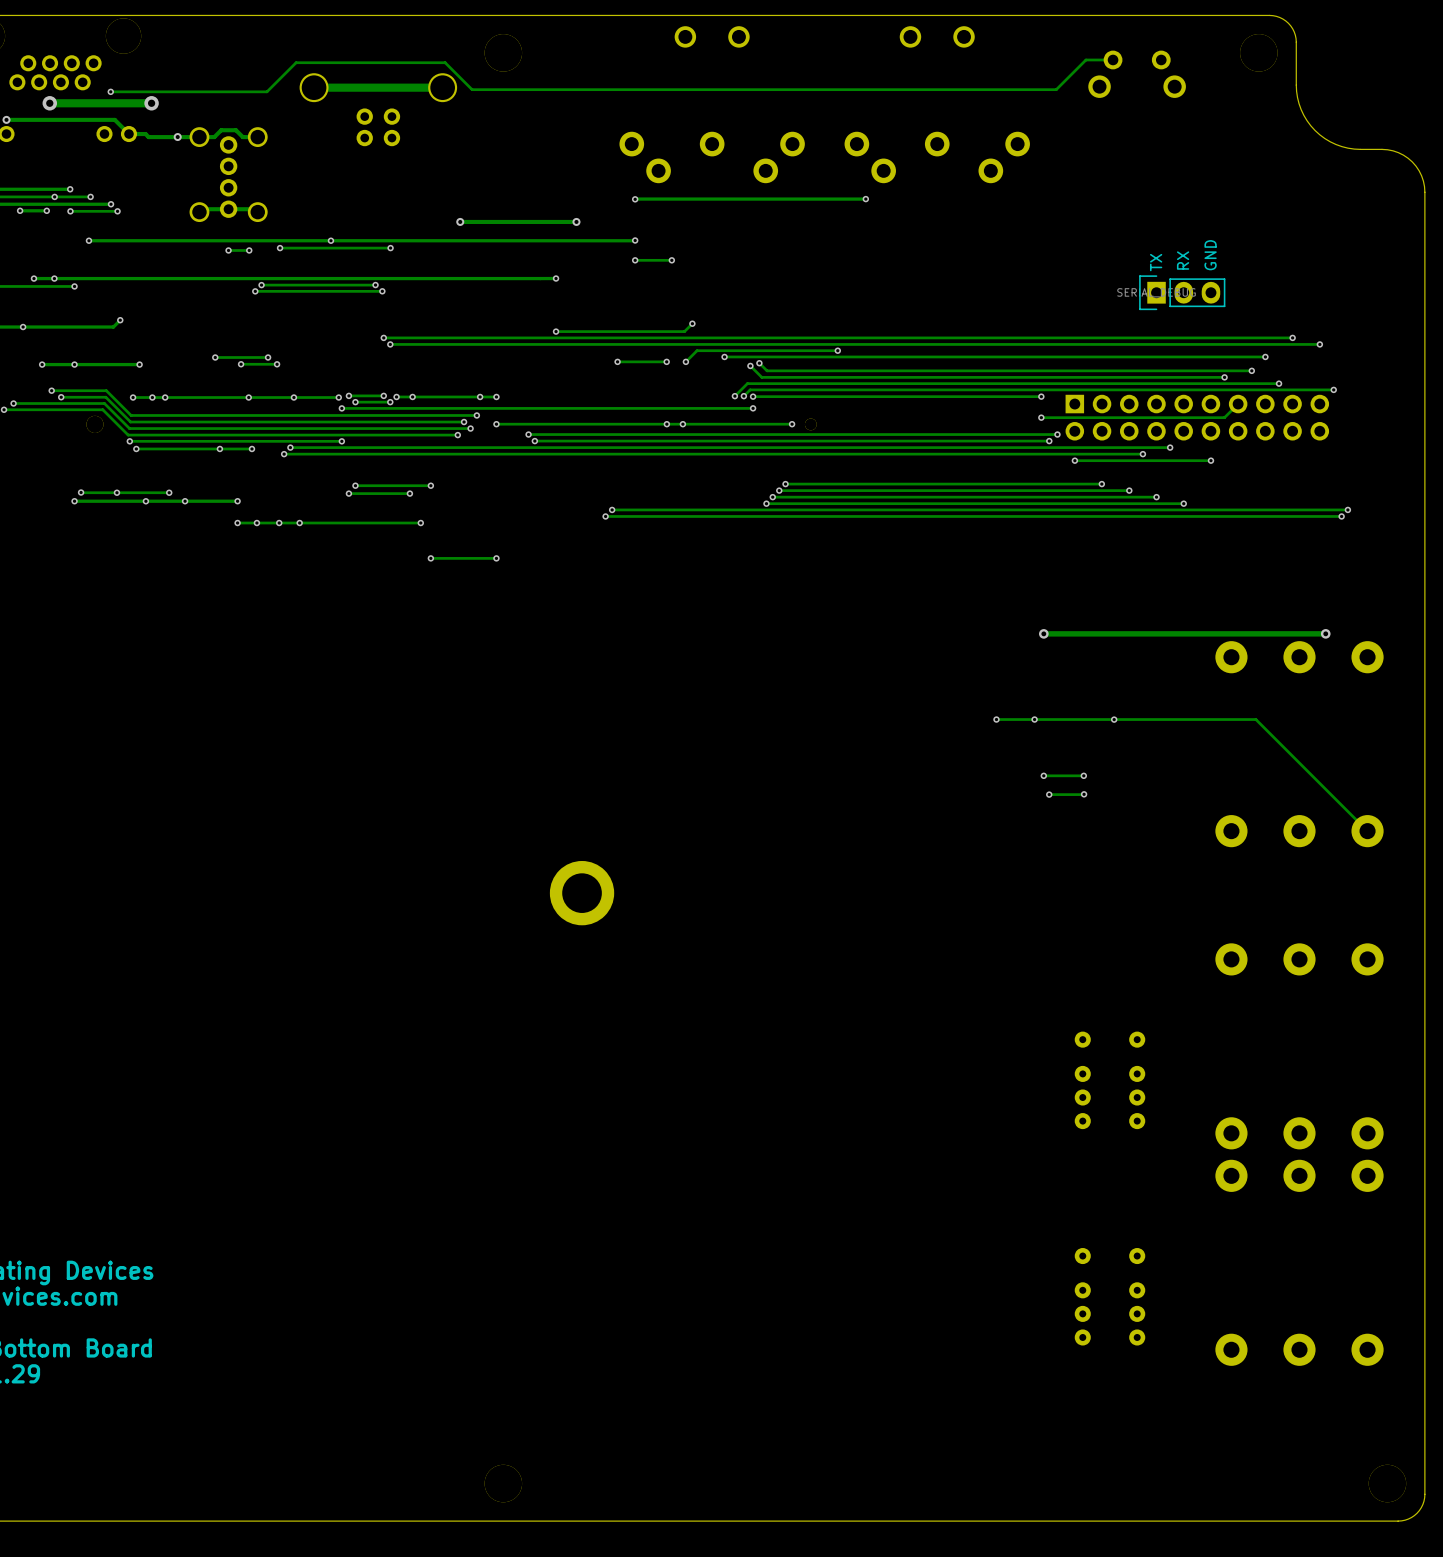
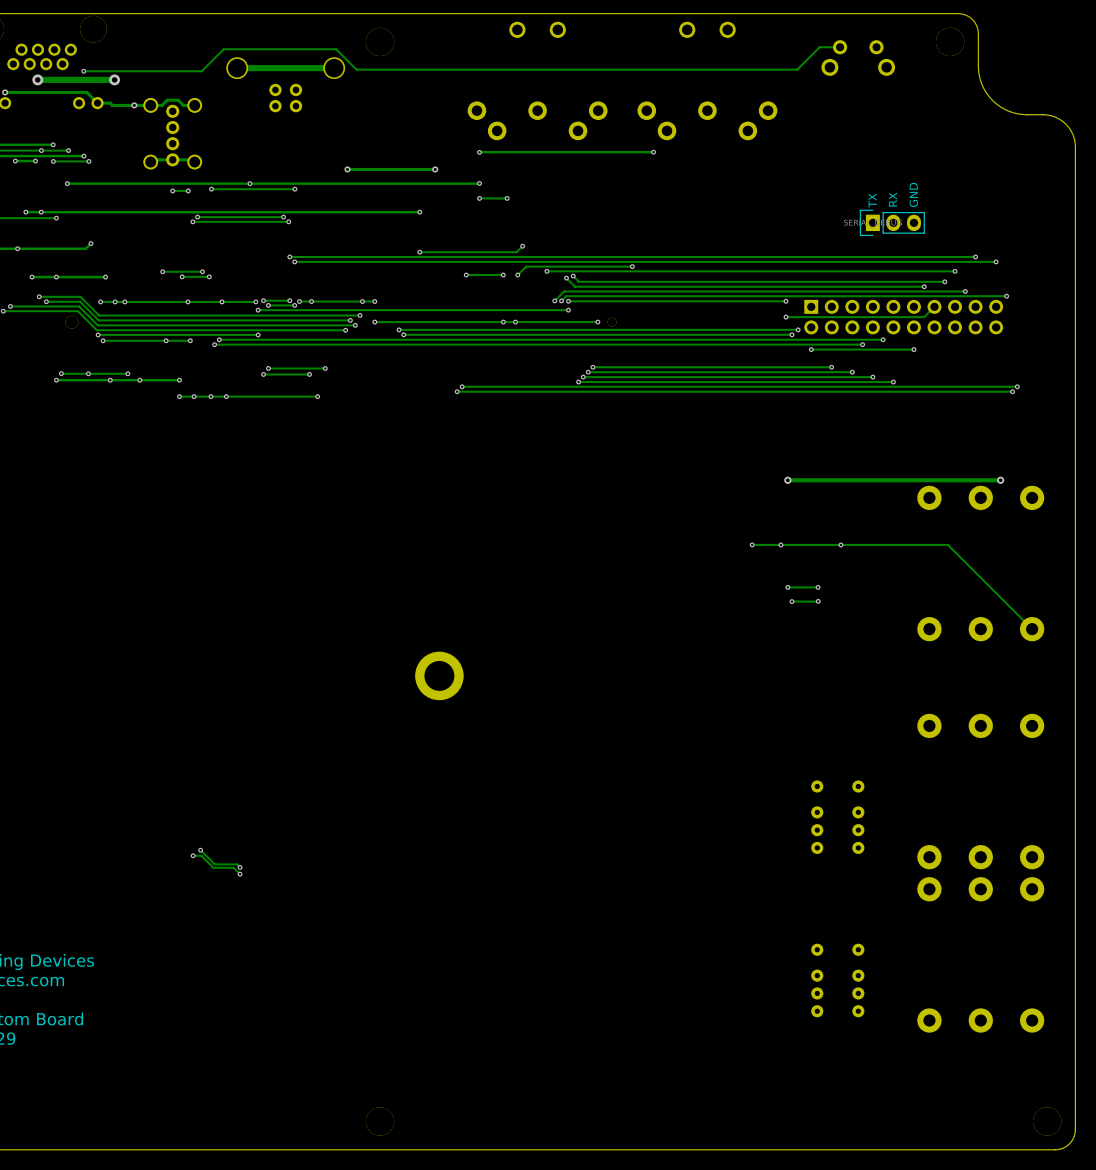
via: (430, 558) -> none
track: (496, 558) (430, 558) -> none
via: (496, 558) -> none
track: none -> (200, 850) (214, 864) (236, 864) (240, 867)
via: none -> (200, 850)
track: none -> (193, 855) (201, 855) (213, 867) (233, 867) (240, 874)
via: none -> (193, 855)
via: none -> (240, 867)
via: none -> (240, 874)

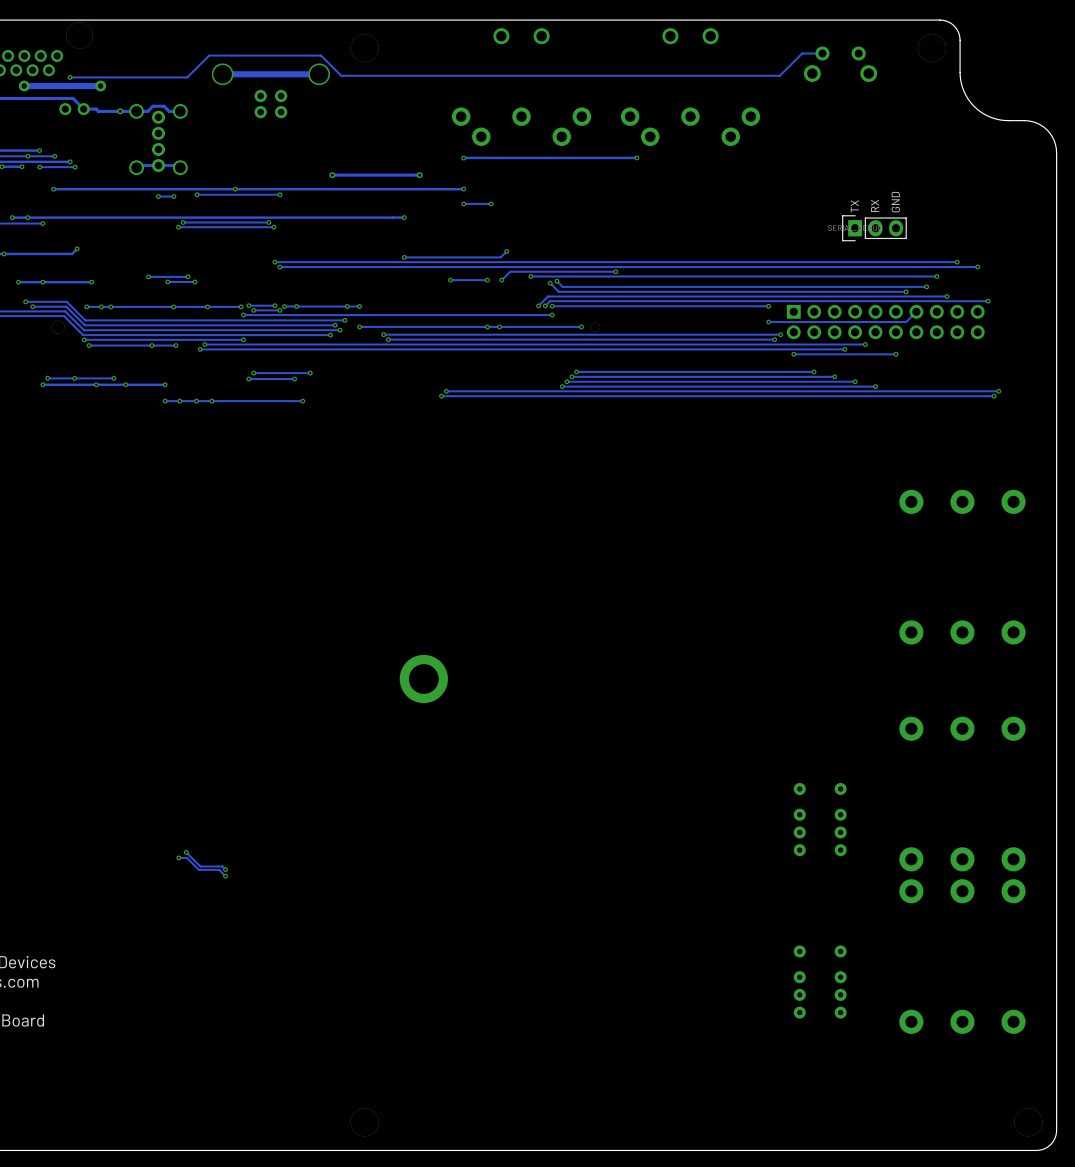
via: (787, 480) -> none
track: (1000, 480) (787, 480) -> none
via: (1000, 480) -> none
track: (752, 544) (947, 544) (1032, 629) -> none
via: (752, 544) -> none
via: (780, 544) -> none
via: (840, 544) -> none
via: (787, 587) -> none
track: (818, 587) (787, 587) -> none
via: (818, 587) -> none
via: (791, 601) -> none
track: (818, 601) (791, 601) -> none
via: (818, 601) -> none

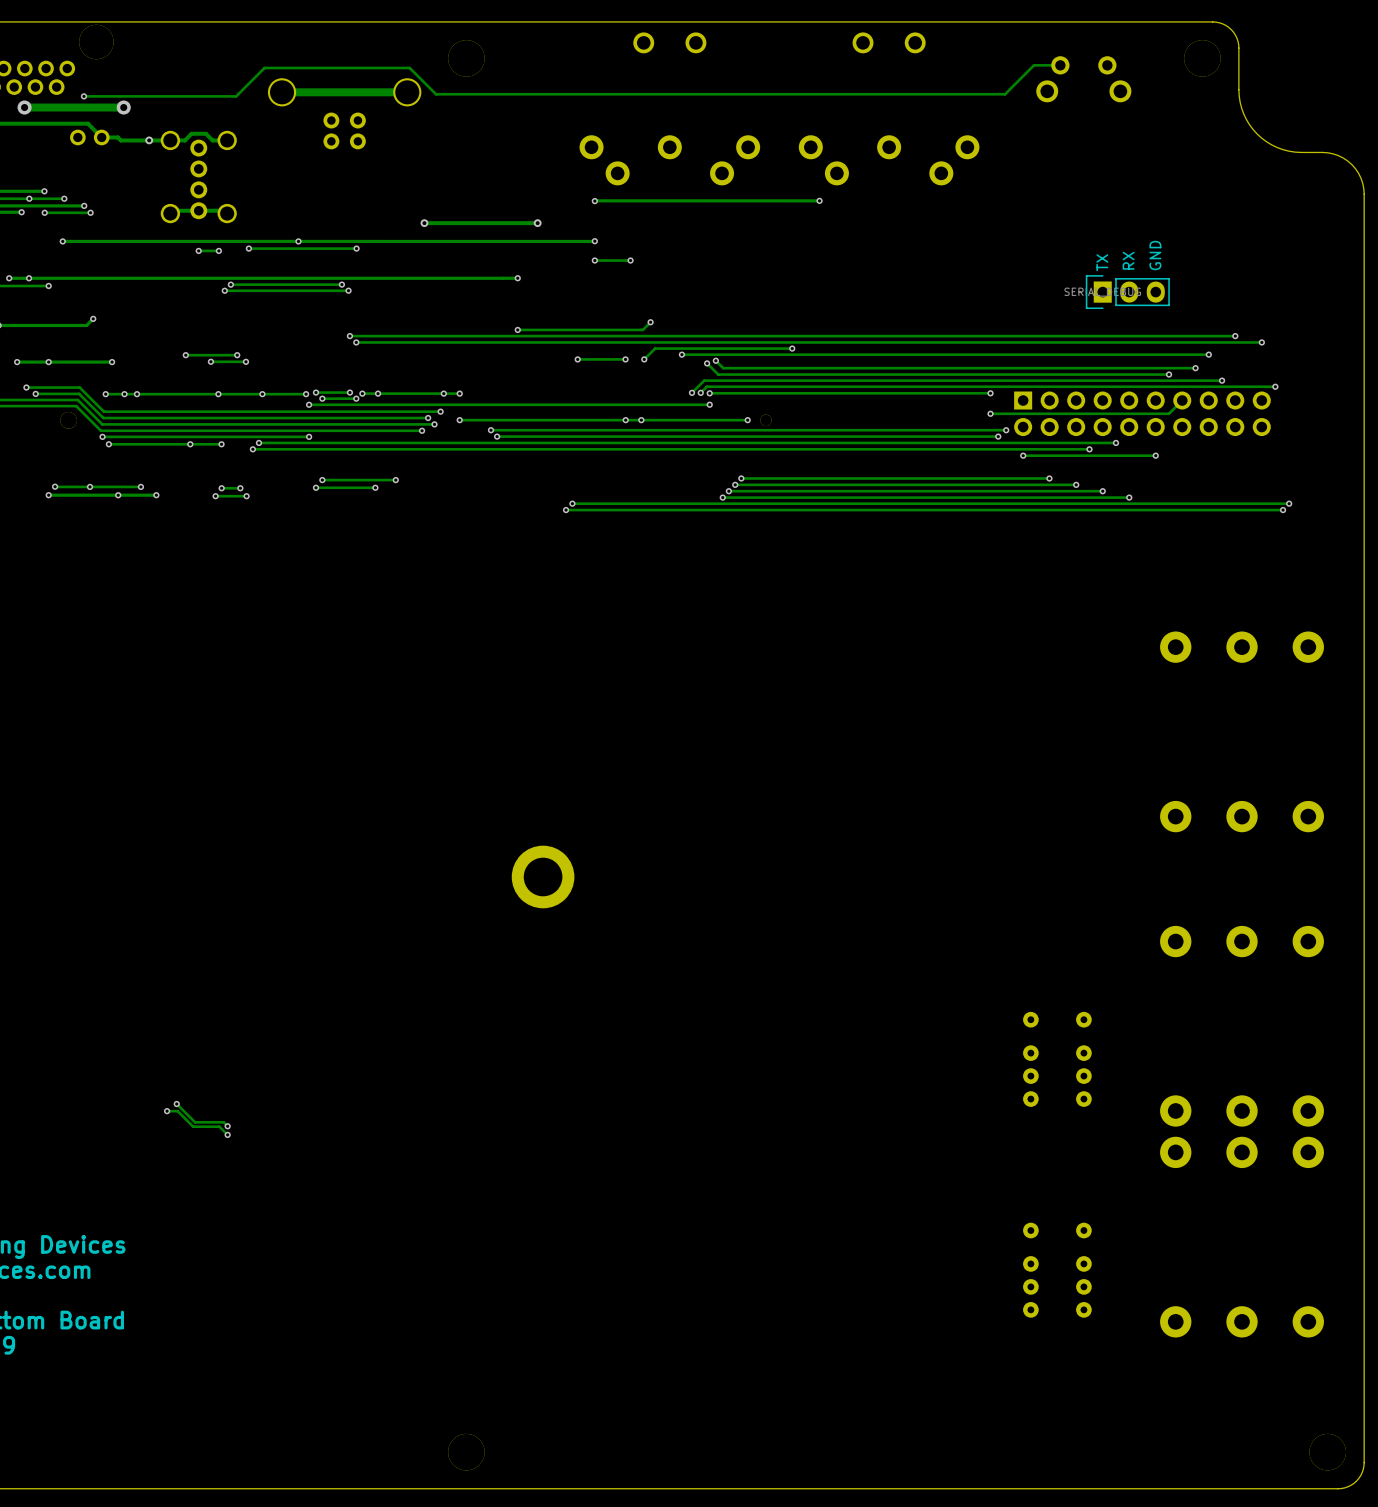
via: none -> (221, 488)
track: none -> (240, 488) (221, 488)
via: none -> (240, 488)
track: (165, 384) (125, 384) -> none
via: (165, 384) -> none
via: none -> (215, 496)
track: none -> (246, 496) (215, 496)
via: none -> (246, 496)
via: (165, 401) -> none
via: (179, 401) -> none
via: (196, 401) -> none
via: (211, 401) -> none
track: (302, 401) (165, 401) -> none
via: (302, 401) -> none
track: (186, 852) (200, 866) (222, 866) (225, 869) -> (176, 1104) (195, 1122) (223, 1122) (227, 1126)
via: (186, 852) -> none
via: none -> (176, 1104)
track: (178, 857) (186, 857) (198, 869) (219, 869) (225, 876) -> (167, 1111) (177, 1111) (193, 1126) (219, 1126) (227, 1134)
via: (178, 857) -> none
via: none -> (167, 1111)
via: (225, 869) -> none
via: none -> (227, 1126)
via: (225, 876) -> none
via: none -> (227, 1134)

